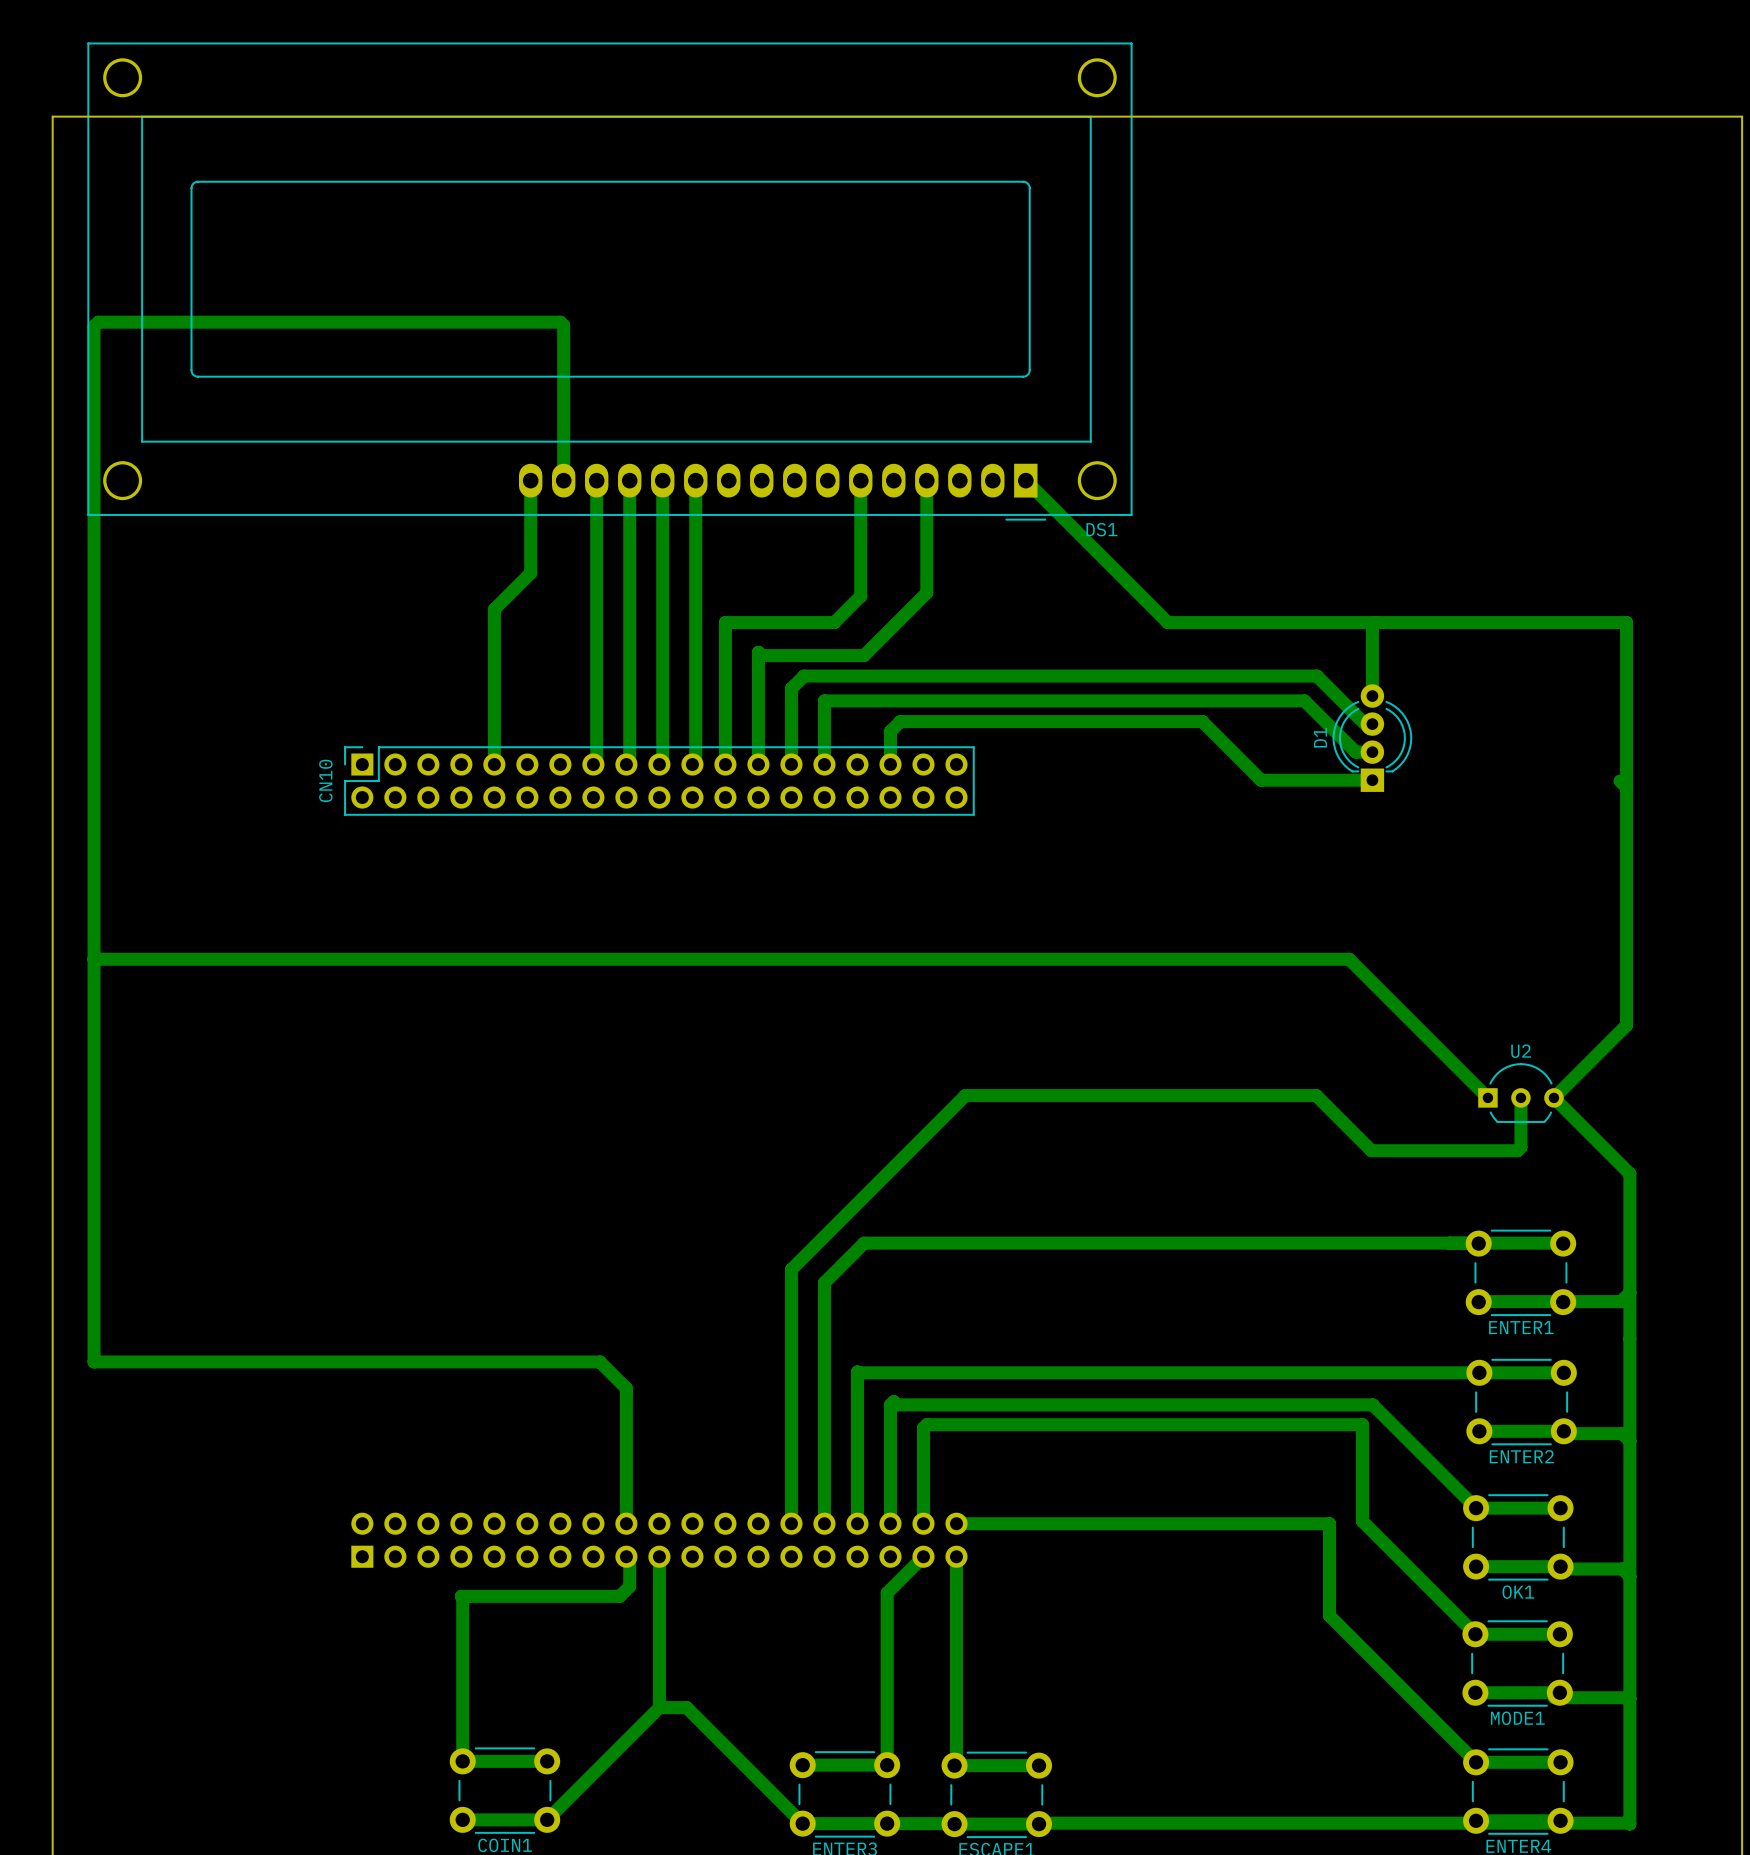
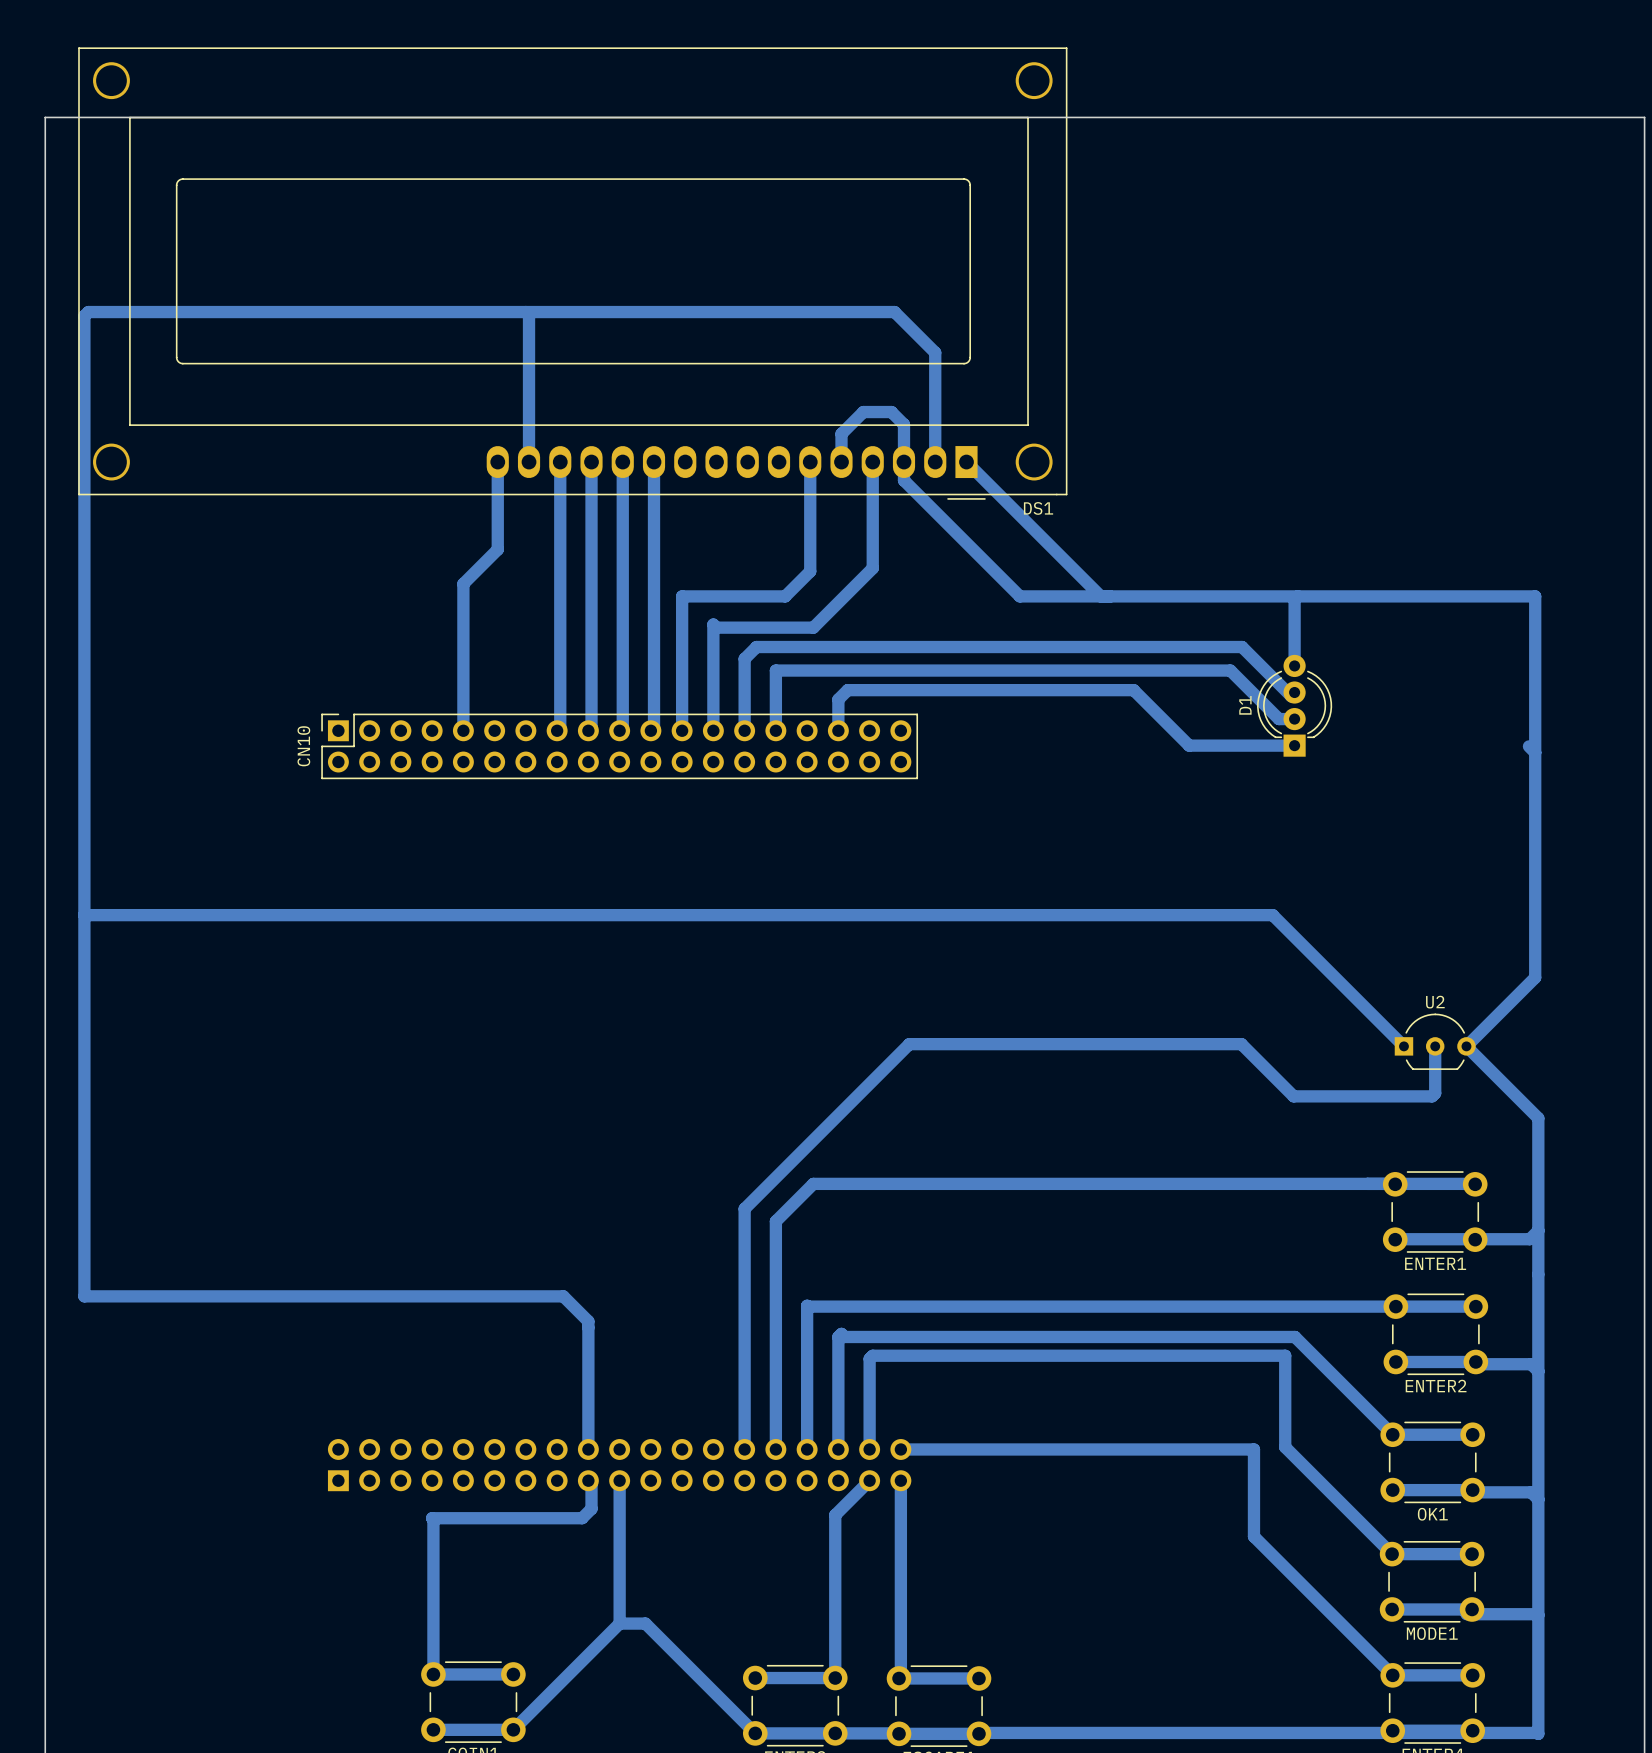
bottom track: none -> (525, 312) (894, 312) (935, 352) (935, 462)
bottom track: none -> (841, 462) (841, 433) (863, 412) (891, 412) (904, 424) (904, 480) (1019, 596) (1100, 596)

